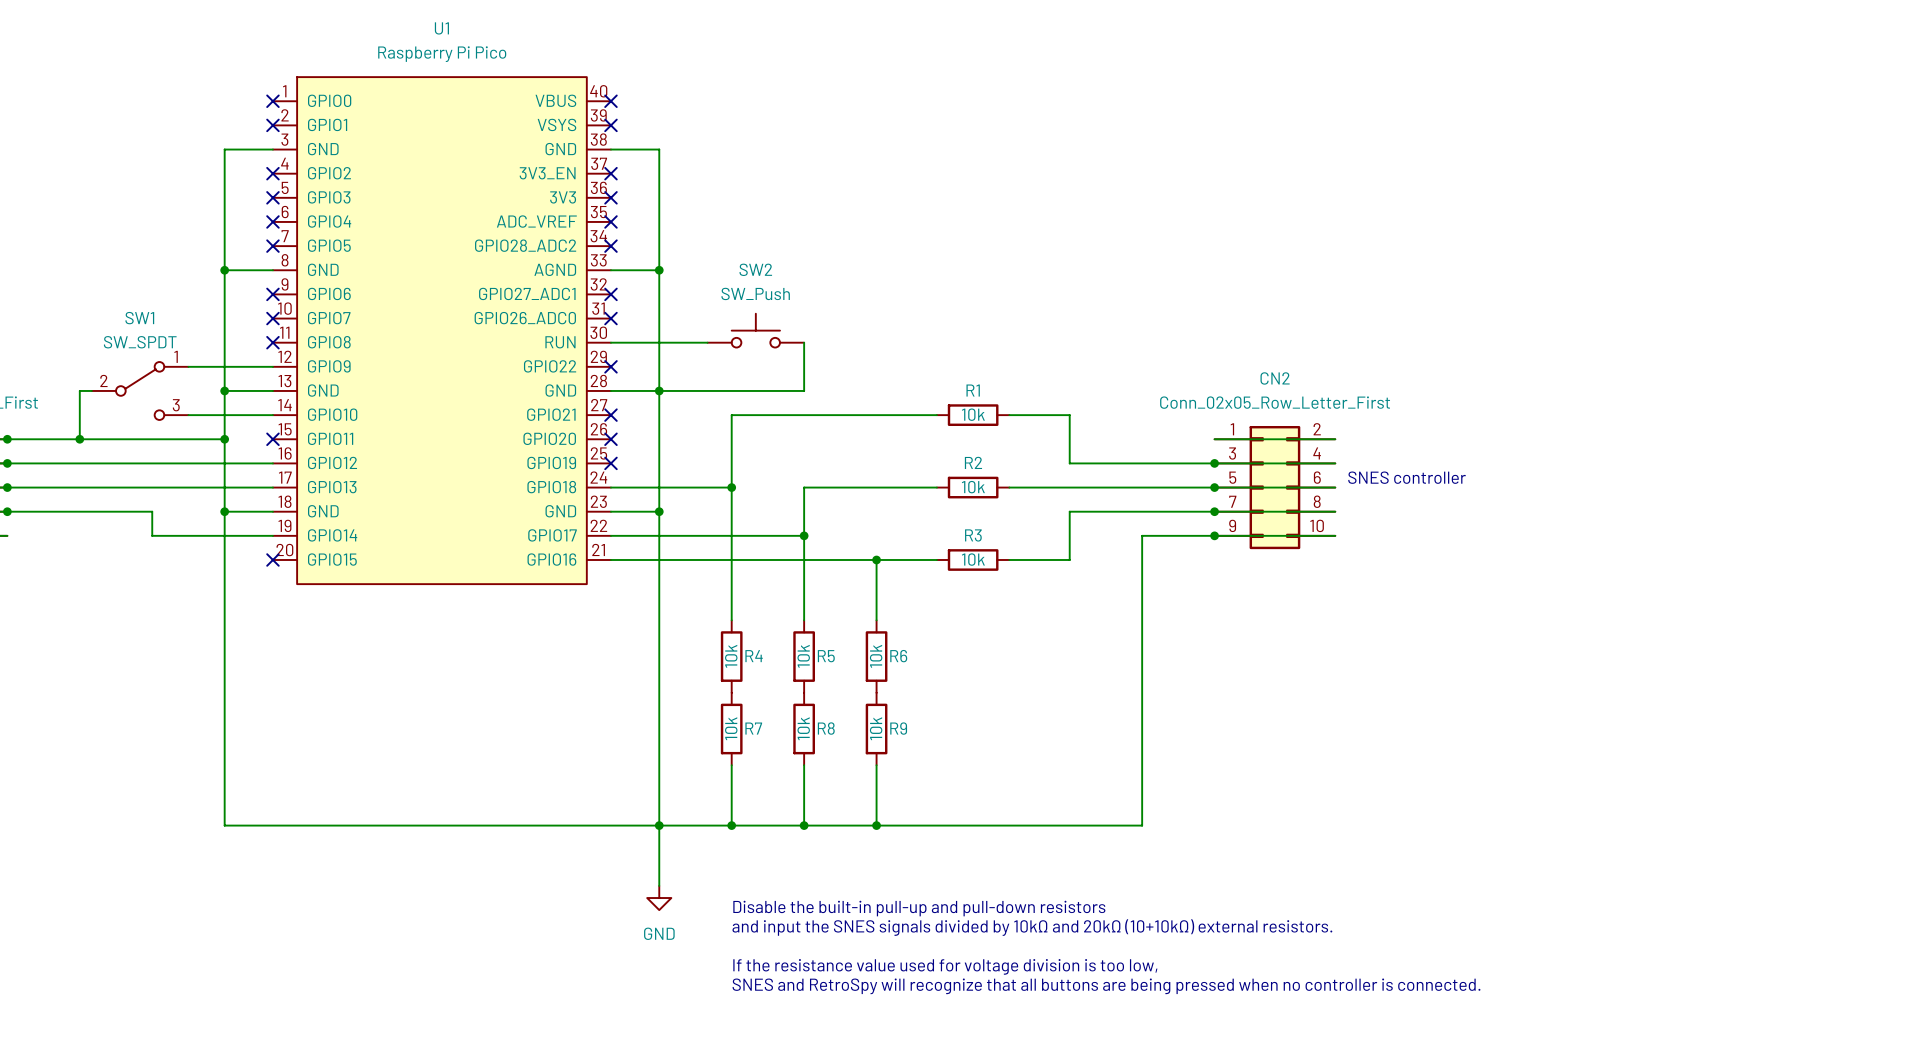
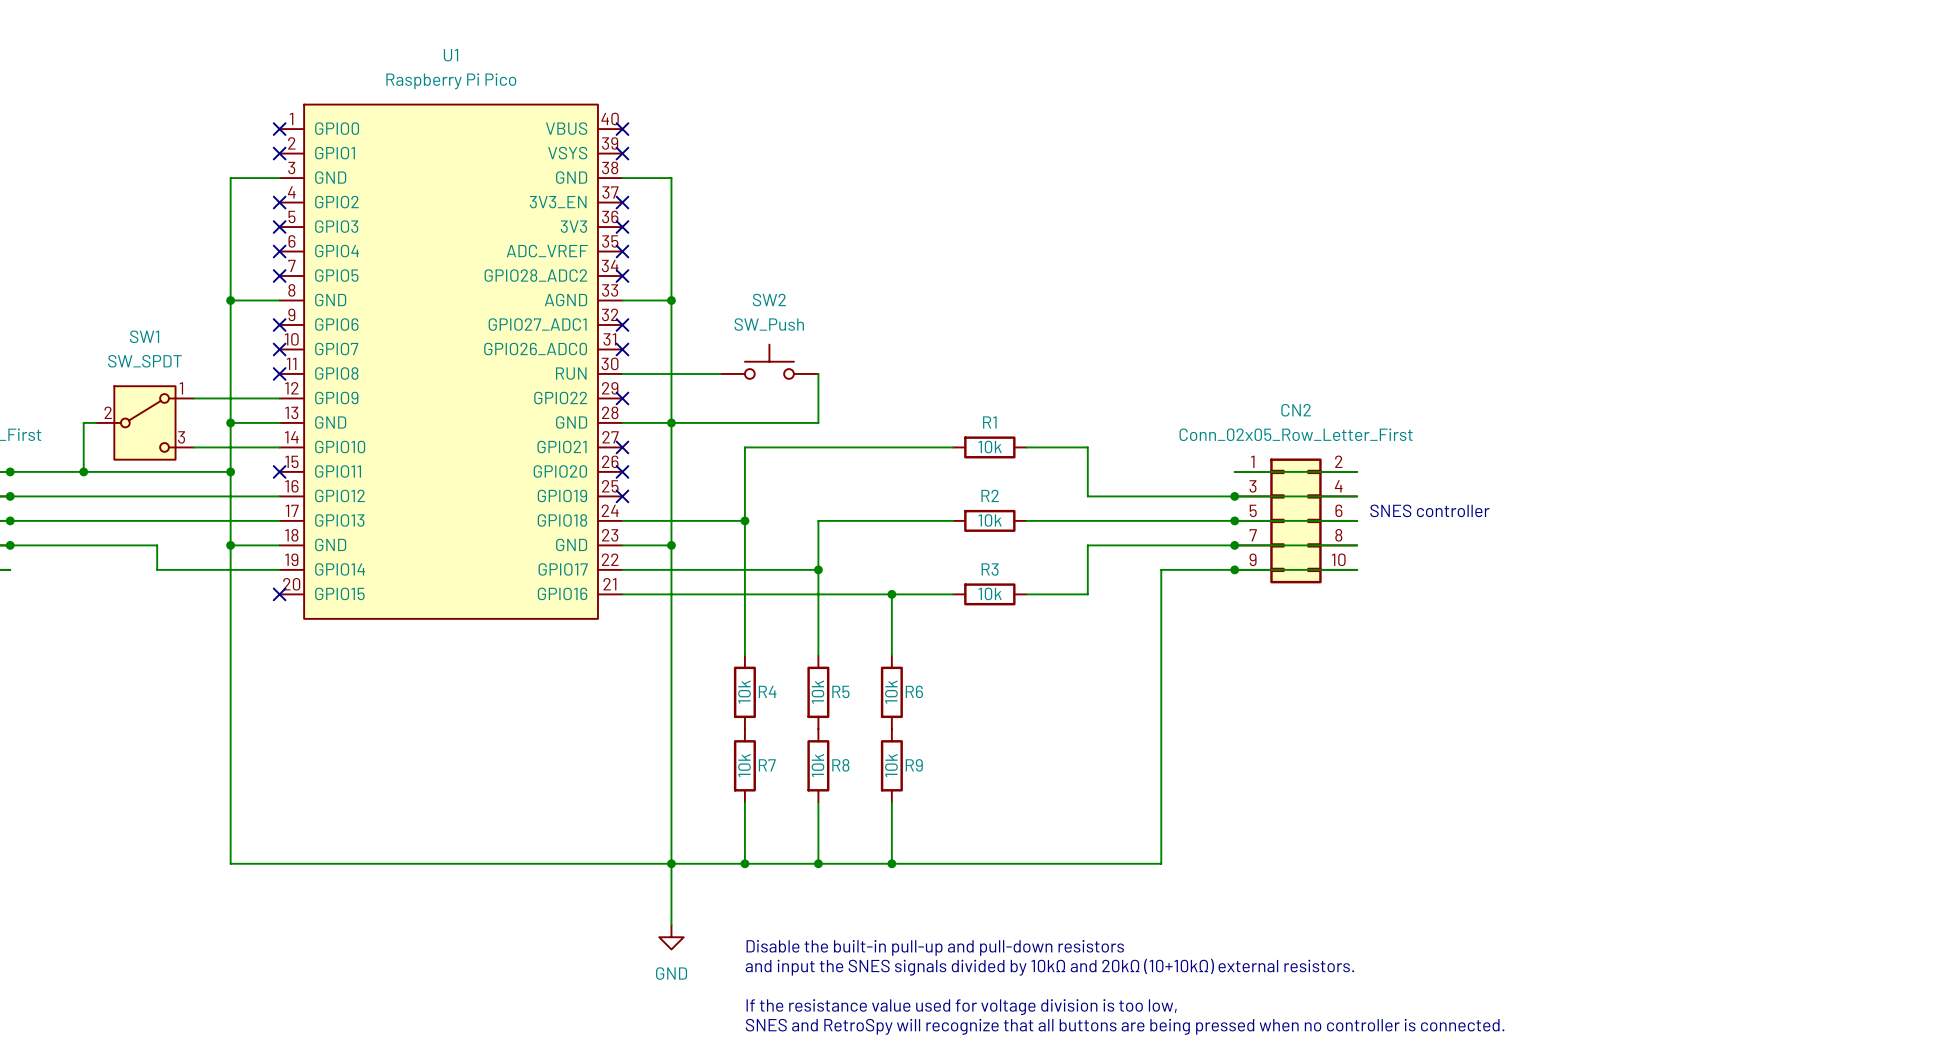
SW1 symbol: [91, 362, 189, 420] -> [95, 386, 194, 460]

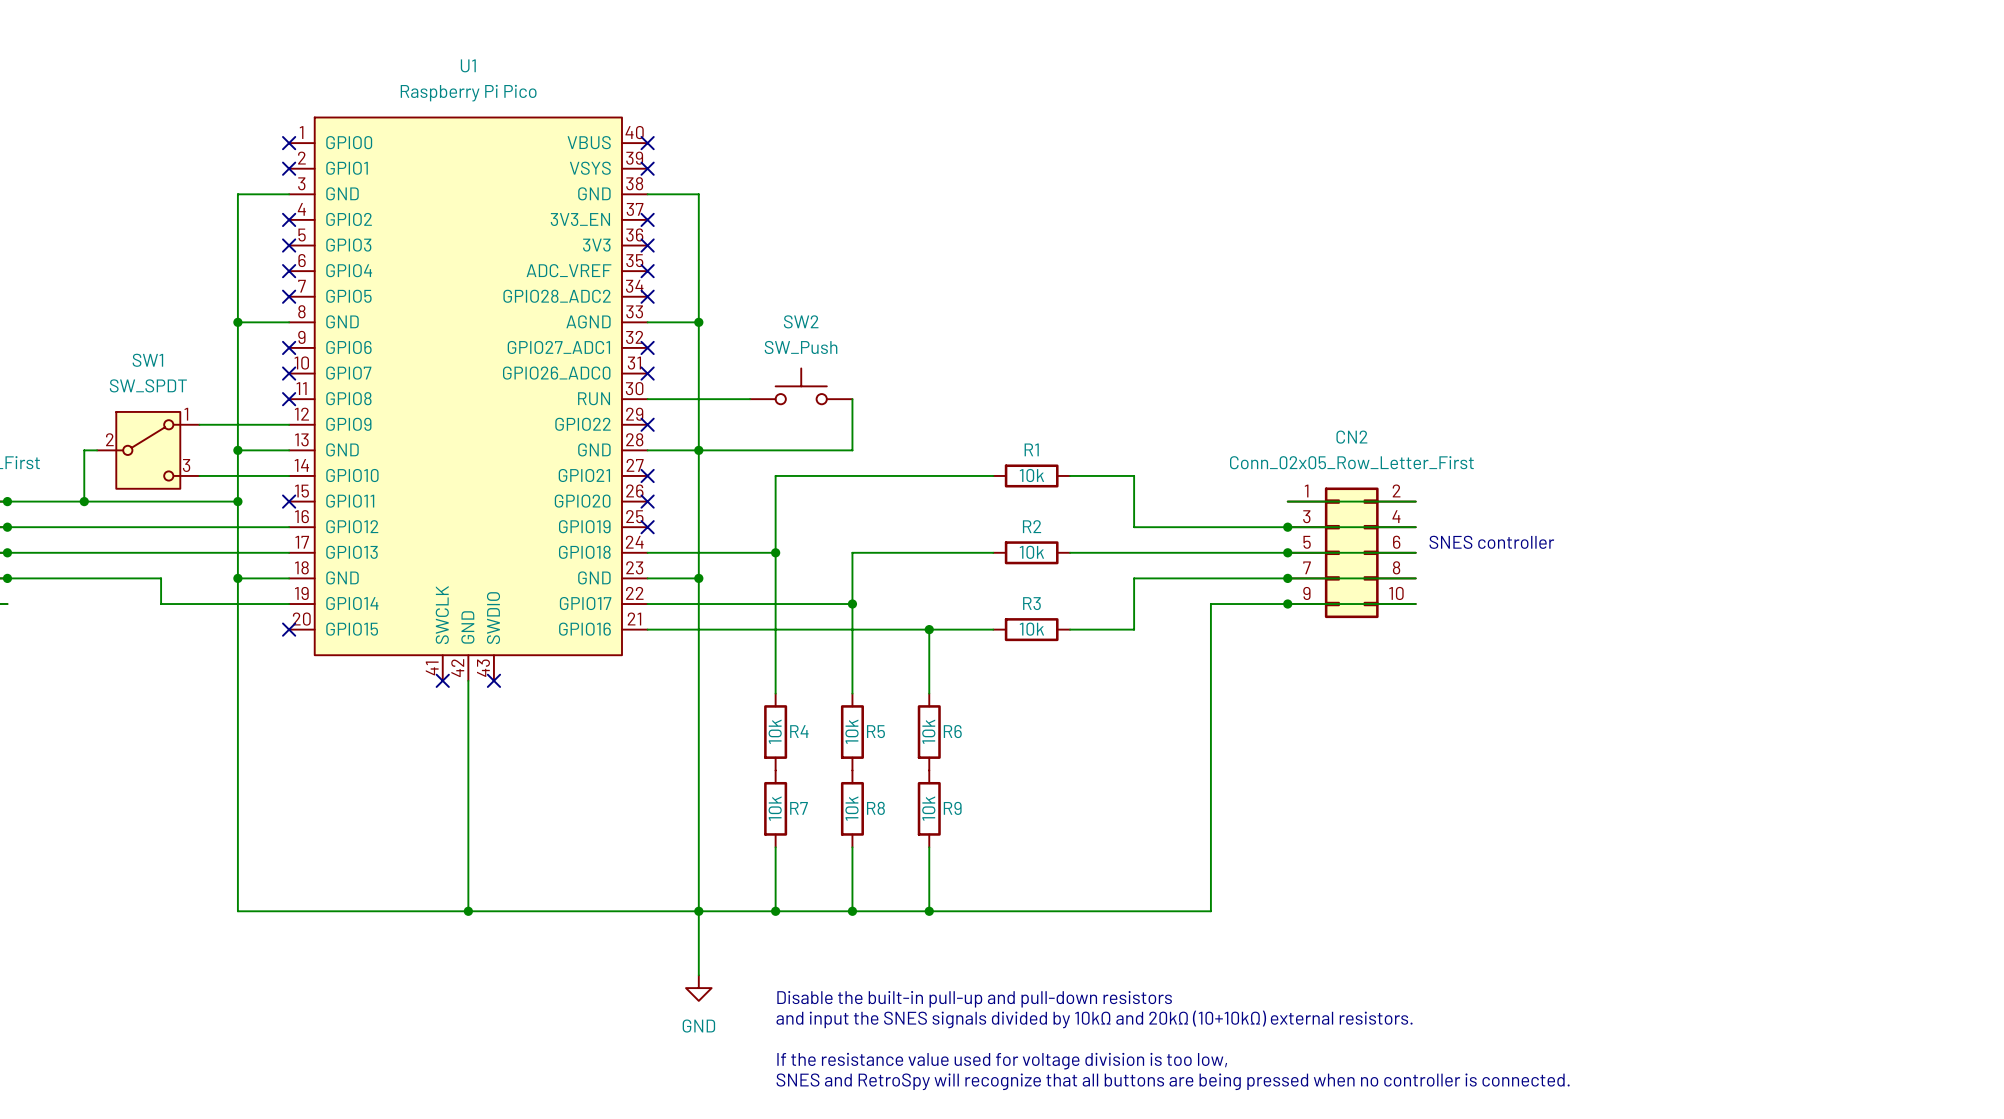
U1 symbol: [279, 104, 623, 619] -> [289, 117, 648, 681]
no-connect mark: none -> (442, 680)
wire: none -> (468, 680) (468, 911)
no-connect mark: none -> (493, 680)
junction: none -> (468, 911)

